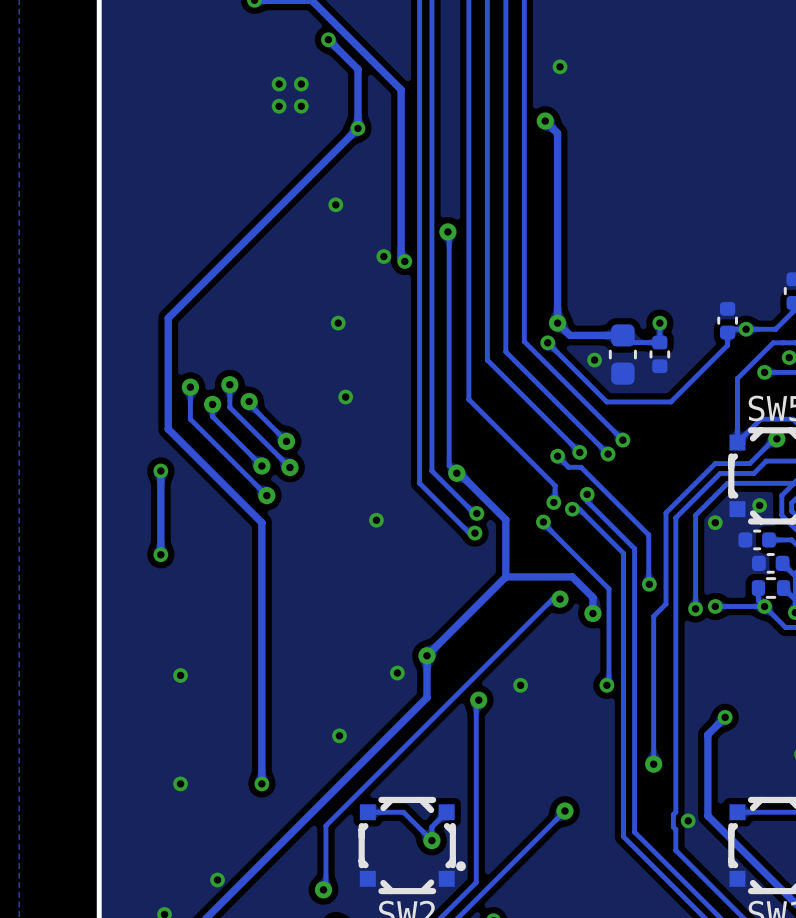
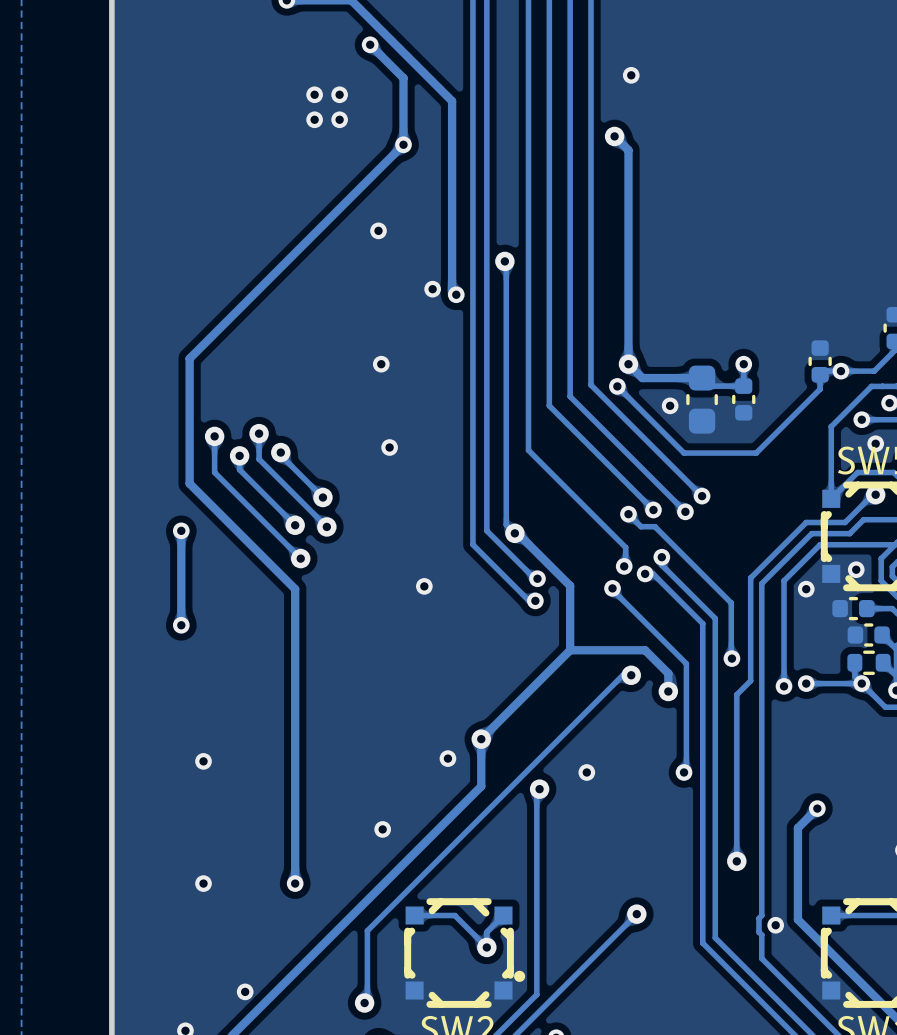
via: none -> (875, 443)

